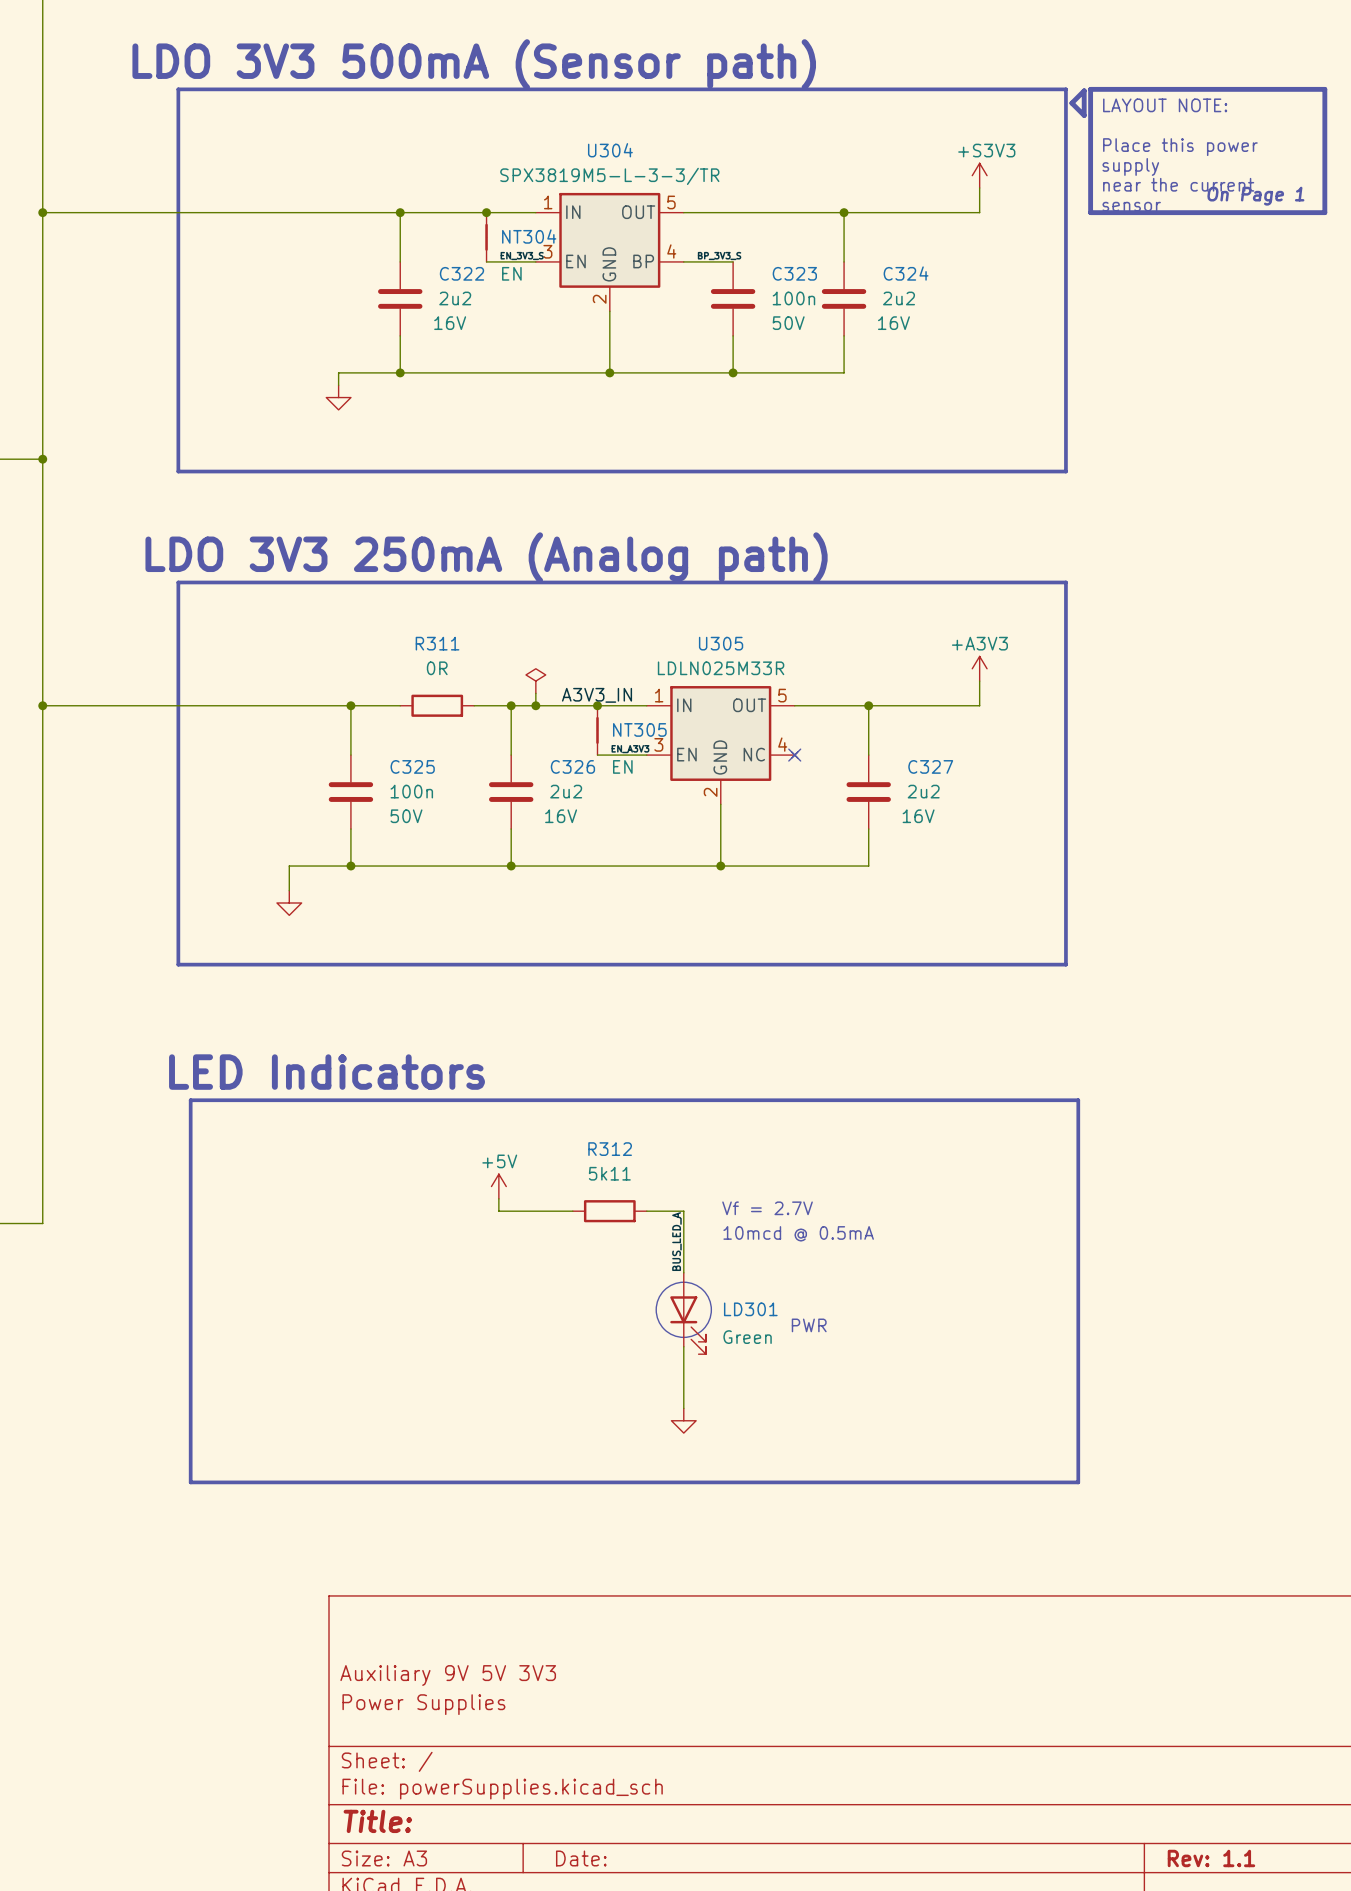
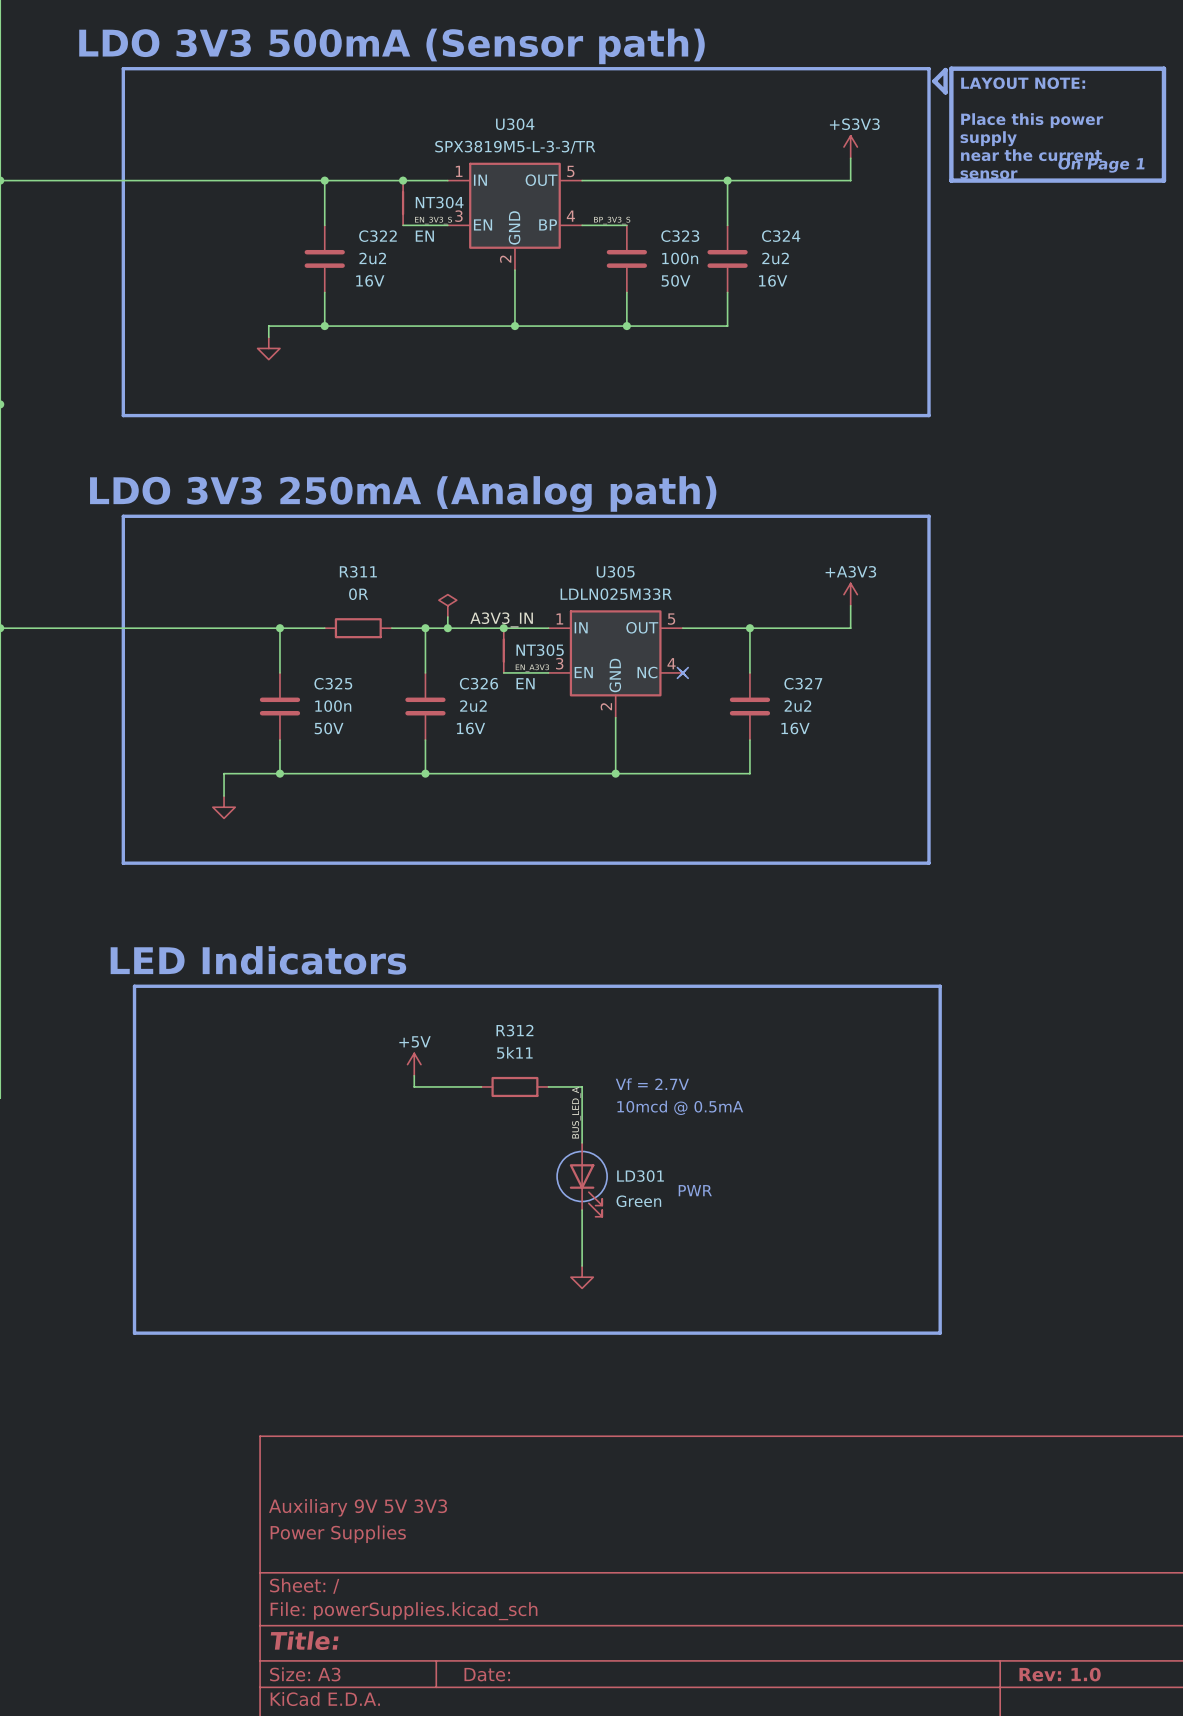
title block: Rev: 1.1 (1211, 1858) -> Rev: 1.0 (1060, 1674)

